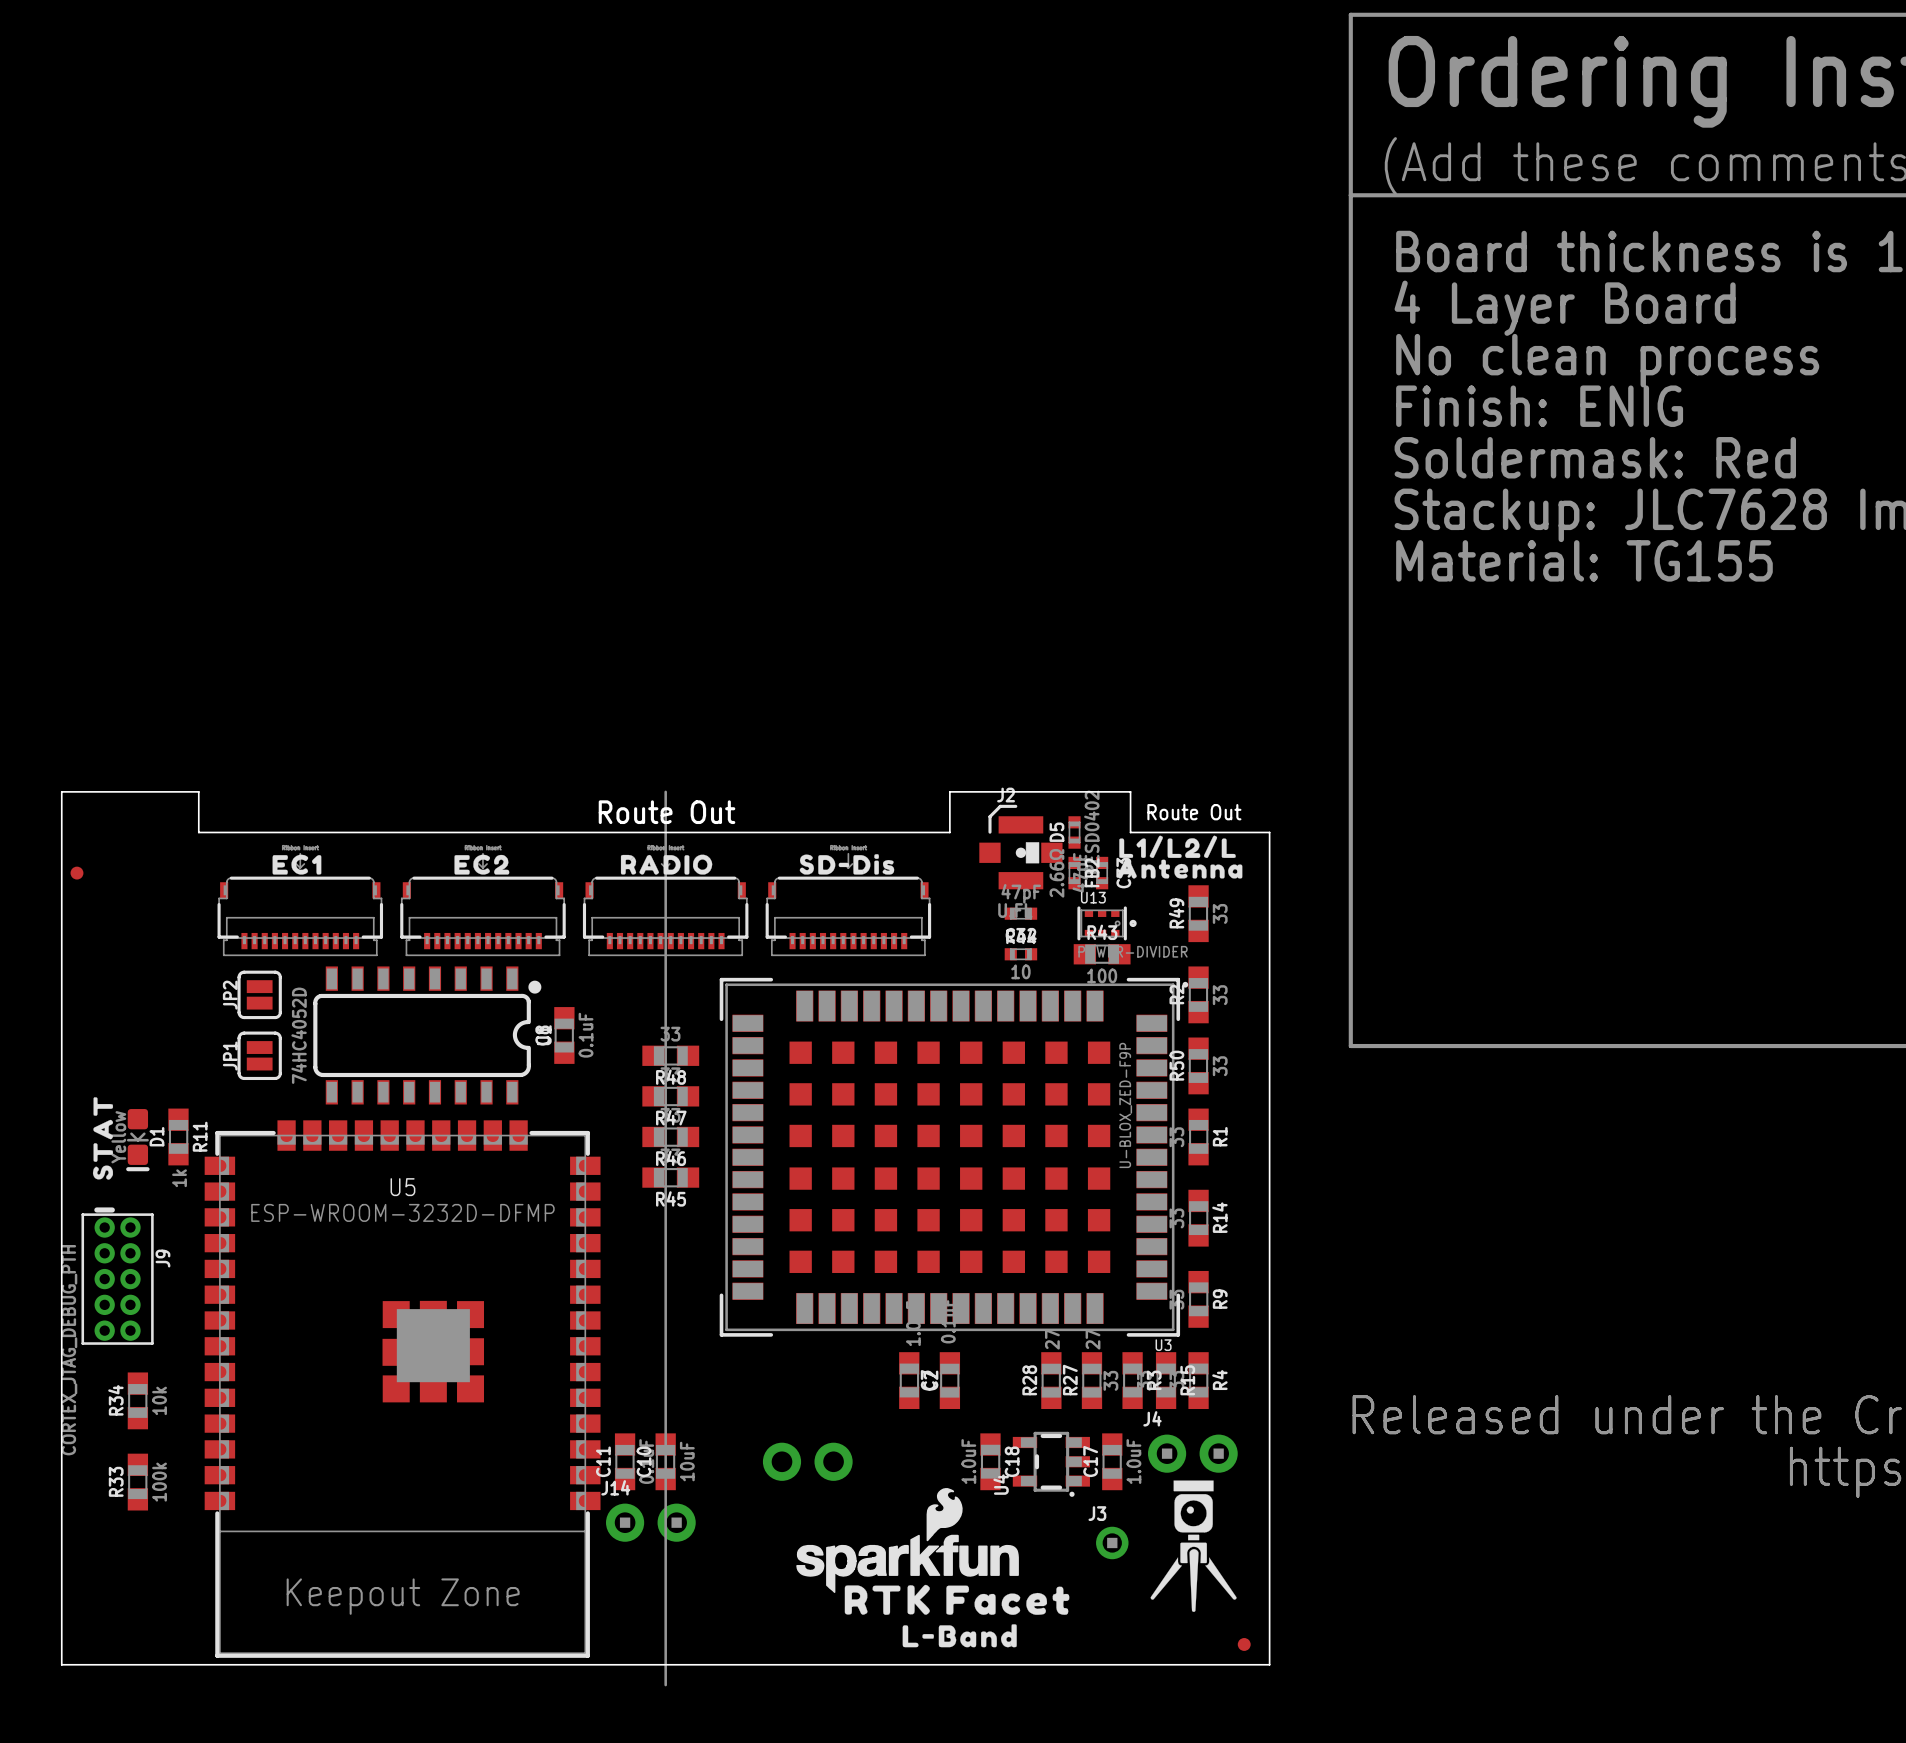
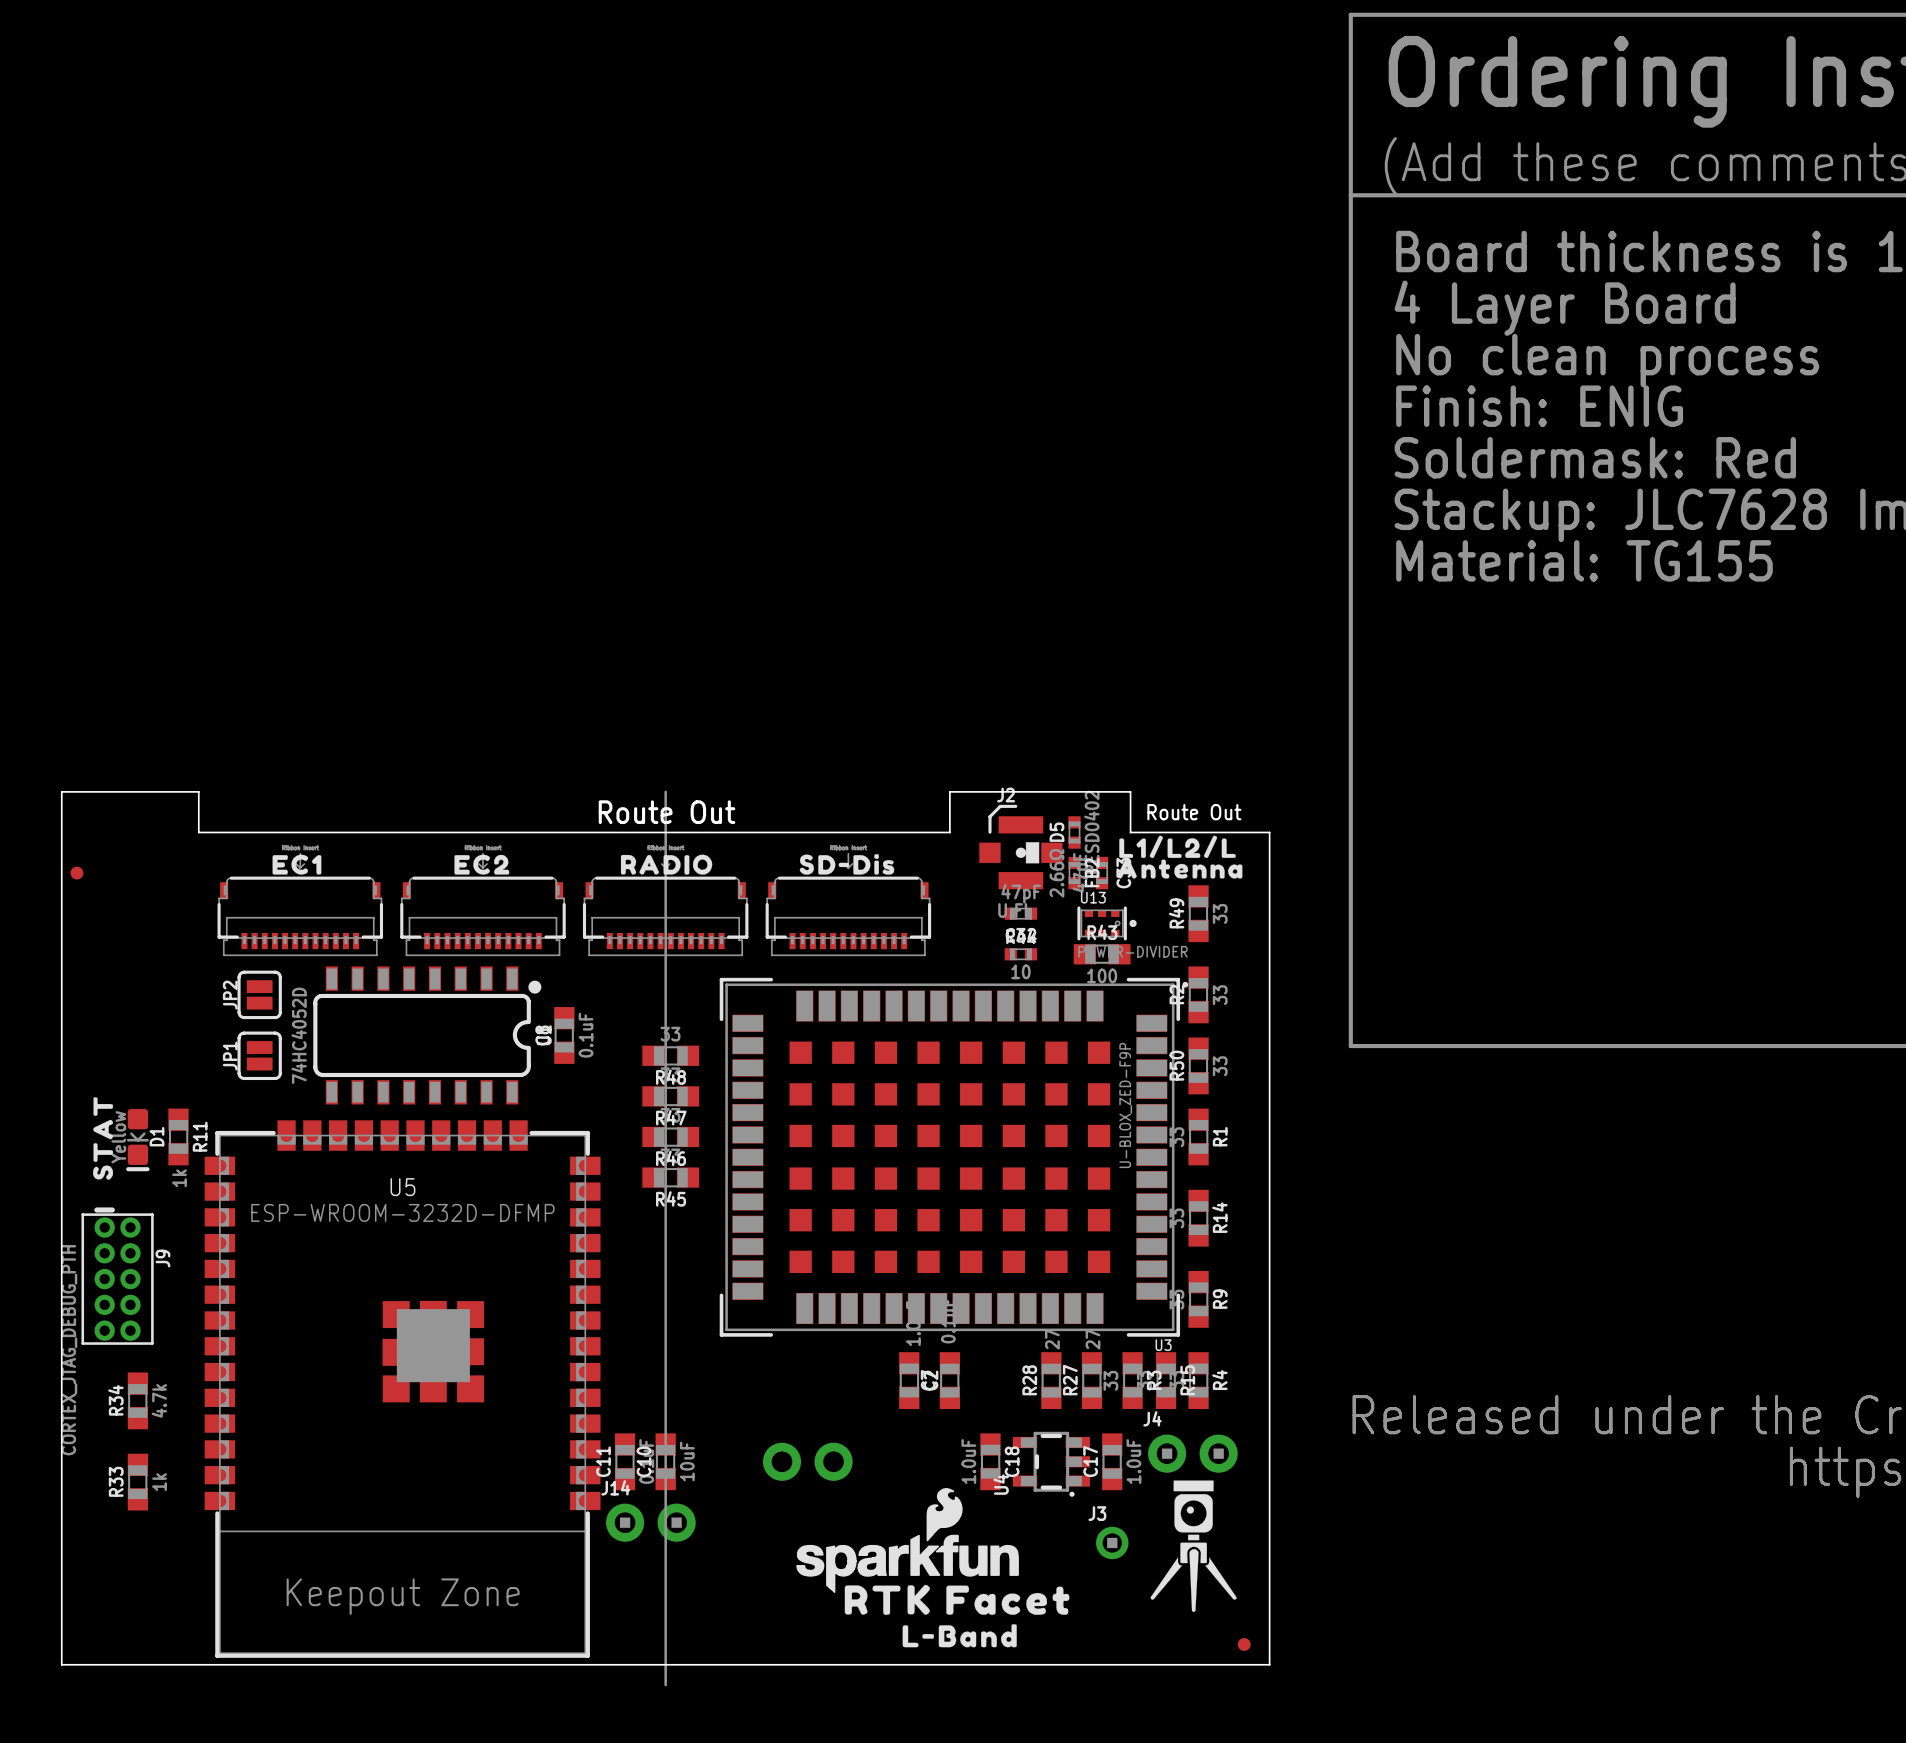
R34 value: 10k (159, 1400) -> 4.7k (159, 1400)
R33 value: 100k (159, 1482) -> 1k (159, 1482)

